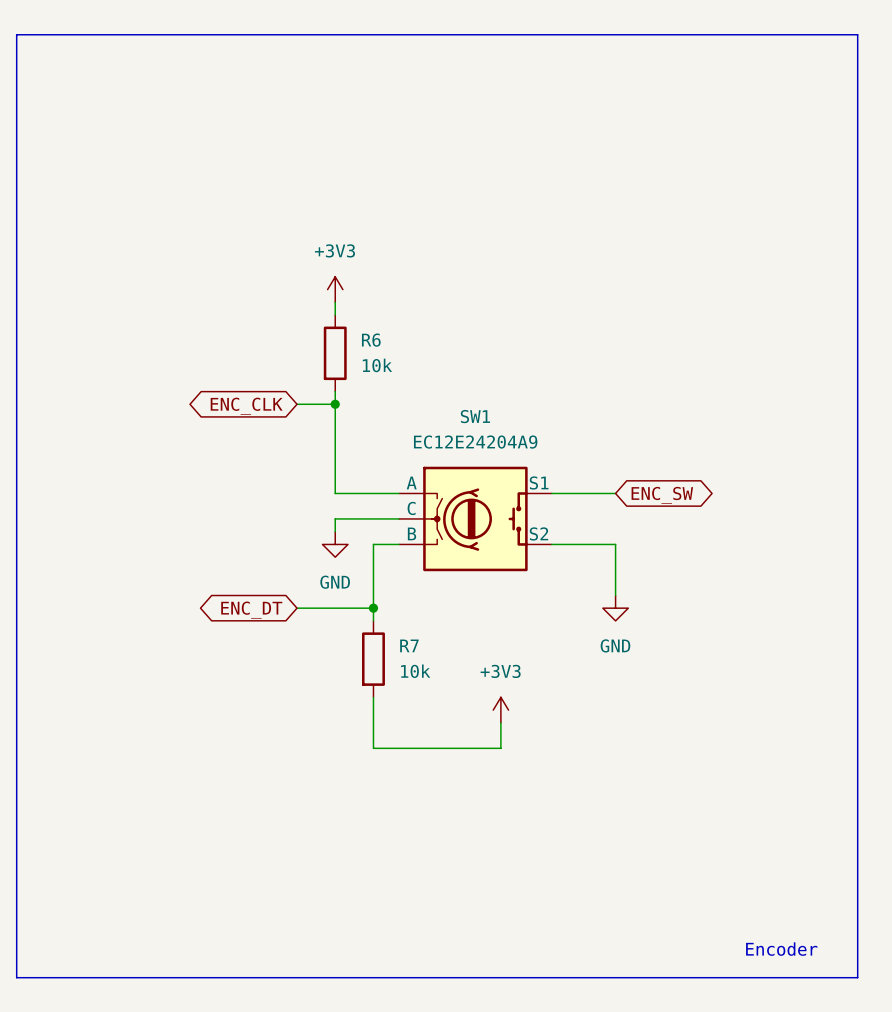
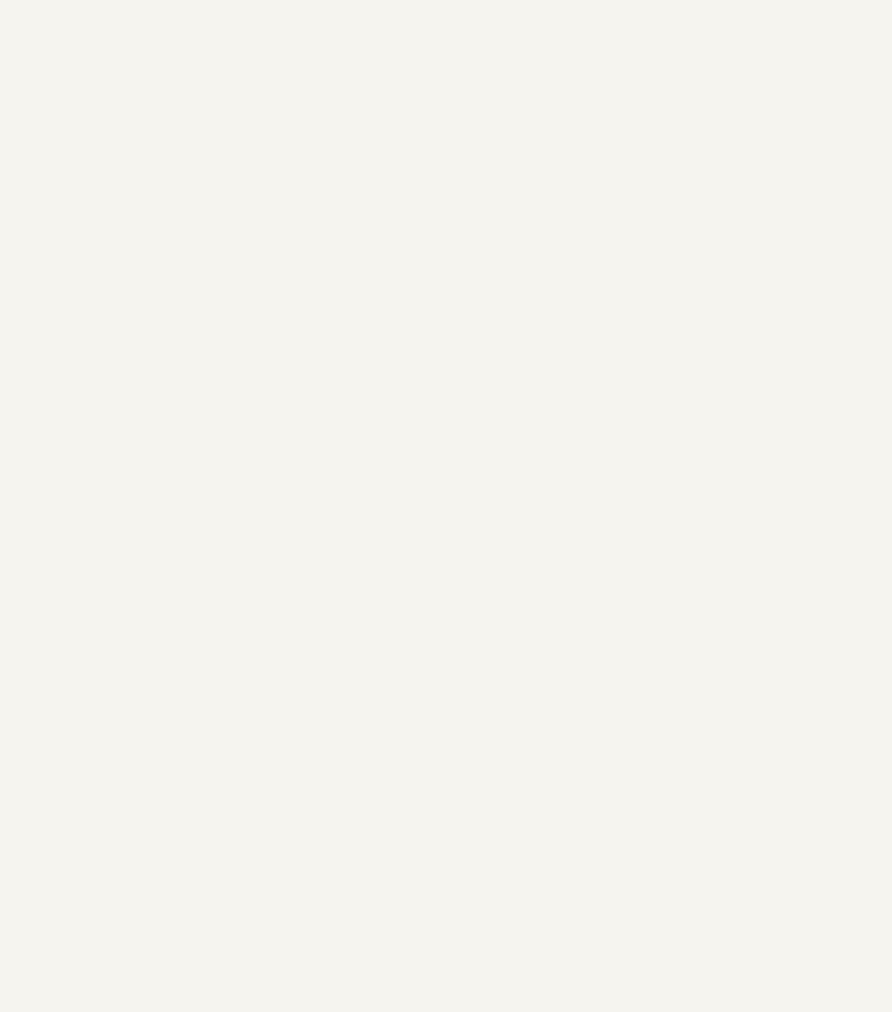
line: (16, 34) (857, 34) (857, 977) (16, 977) (16, 34) -> none
power symbol: +3V3 (335, 289) -> none
wire: (335, 302) (335, 315) -> none
R6: 10k (335, 353) -> none
wire: (335, 391) (335, 493) (398, 493) -> none
wire: (297, 404) (335, 404) -> none
junction: (335, 404) -> none
global label: ENC_CLK (246, 406) -> none
wire: (551, 493) (615, 493) -> none
global label: ENC_SW (662, 495) -> none
wire: (398, 518) (335, 518) (335, 531) -> none
SW1: EC12E24204A9 (475, 518) -> none
power symbol: GND (335, 544) -> none
wire: (398, 544) (373, 544) (373, 620) -> none
wire: (551, 544) (615, 544) (615, 595) -> none
wire: (297, 608) (373, 608) -> none
junction: (373, 608) -> none
power symbol: GND (615, 608) -> none
global label: ENC_DT (251, 610) -> none
R7: 10k (373, 659) -> none
wire: (373, 697) (373, 748) (500, 748) (500, 722) -> none
power symbol: +3V3 (500, 710) -> none
text: Encoder (781, 949) -> none

